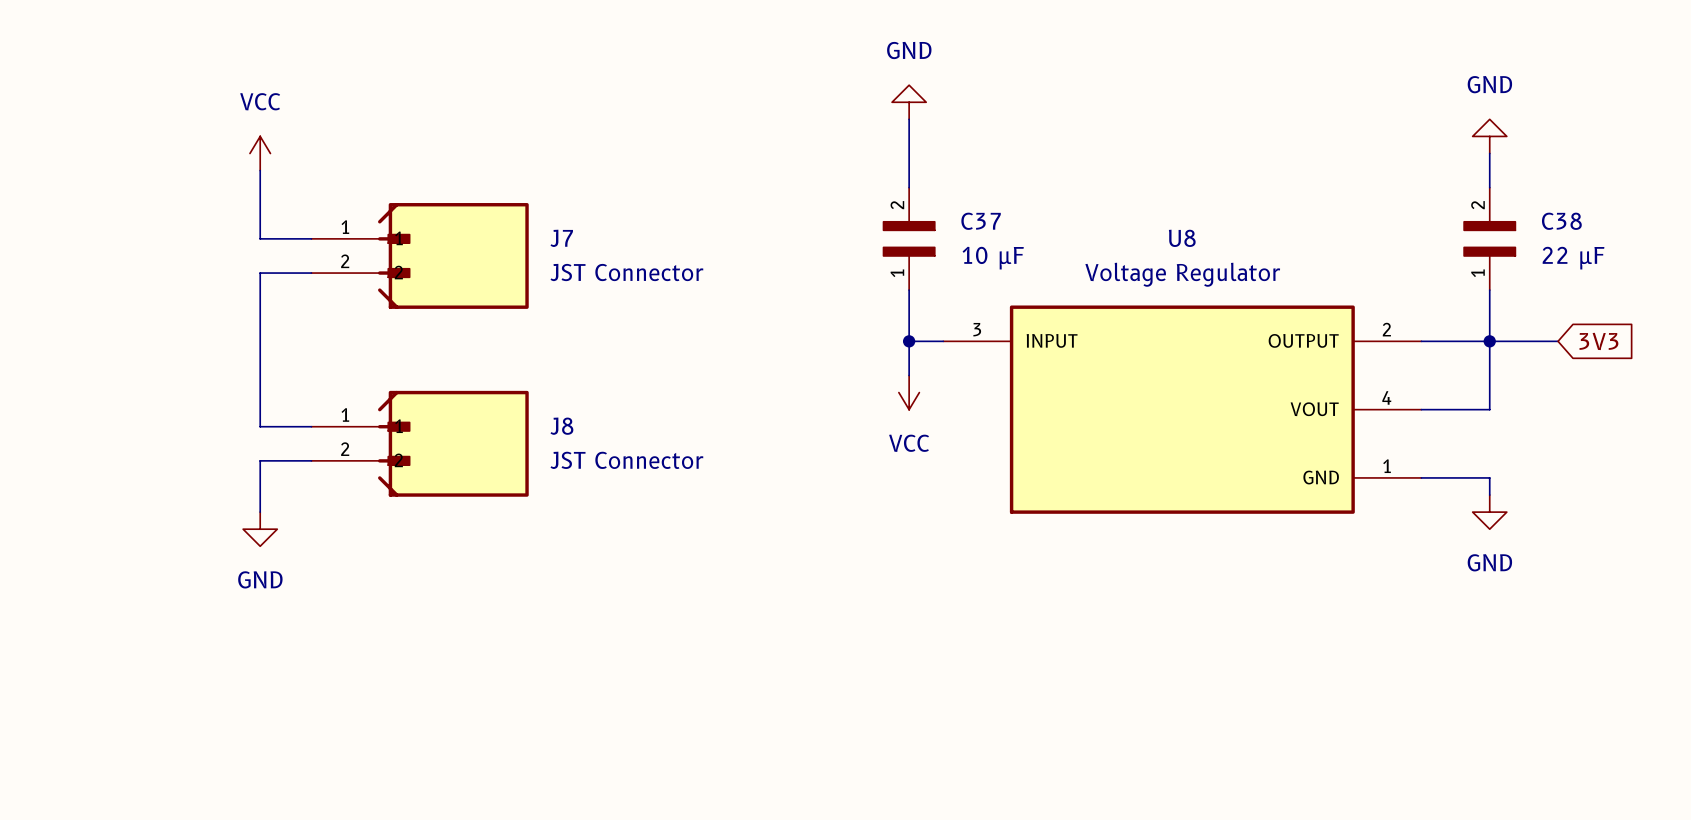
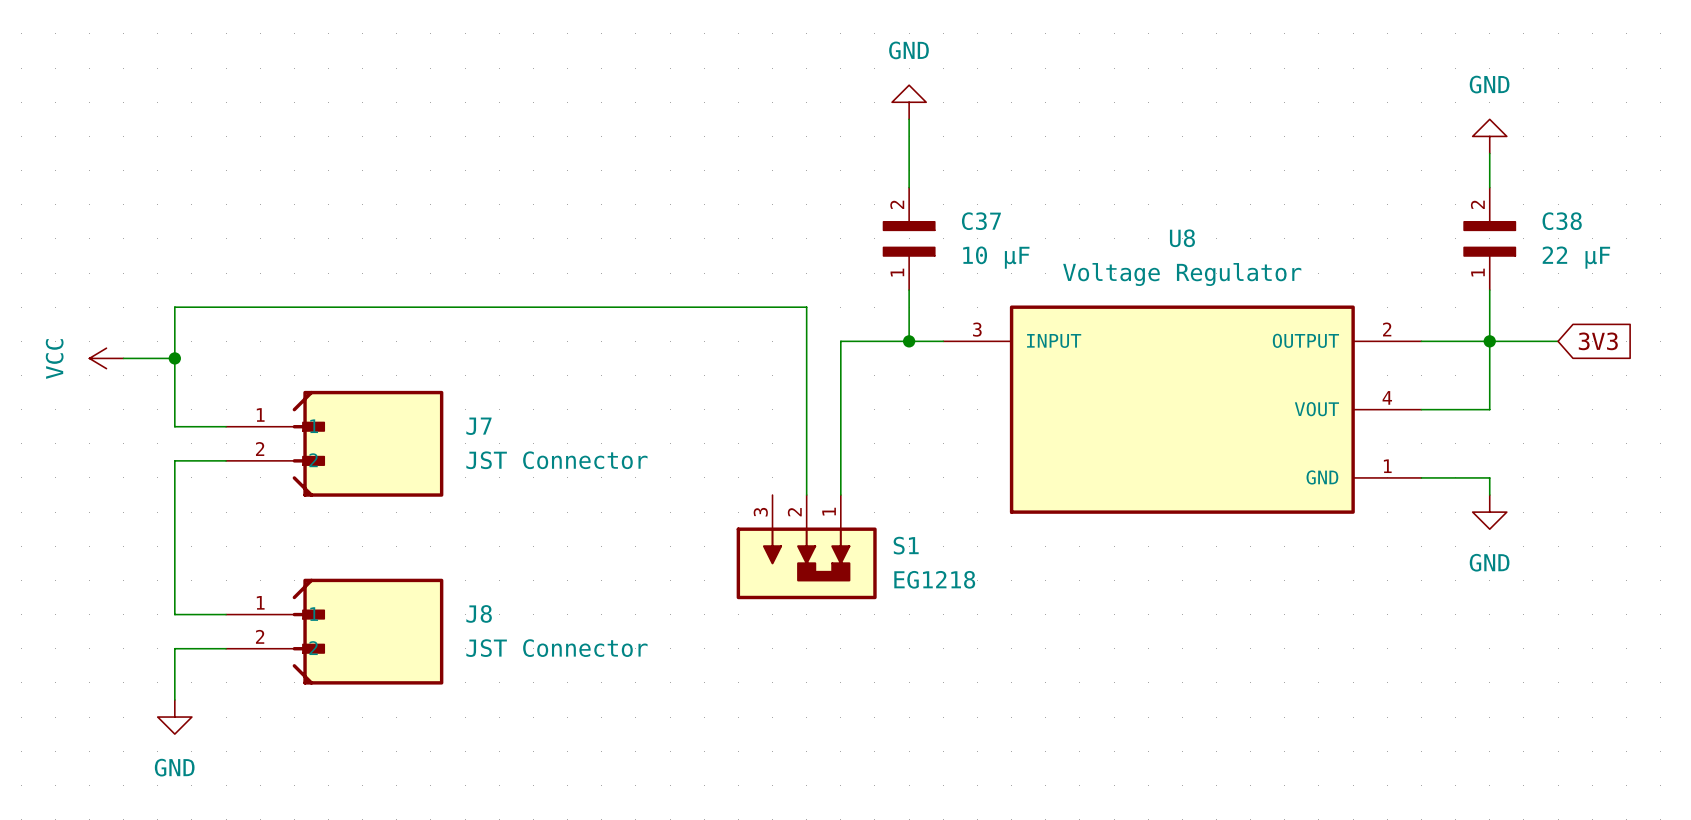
power symbol rotation: 0° (260, 153) -> 90° counterclockwise (106, 358)
power symbol position: VCC (260, 153) -> VCC (106, 358)
wire: (260, 170) (260, 238) (311, 238) -> none
J7 position: (420, 255) -> (334, 443)
wire: (311, 273) (260, 273) (260, 426) (311, 426) -> (226, 460) (174, 460) (174, 614) (226, 614)
wire: (909, 341) (909, 375) -> (909, 341) (840, 341) (840, 495)
wire: none -> (123, 358) (174, 358)
junction: none -> (174, 358)
power symbol: VCC (909, 392) -> none
wire: none -> (226, 426) (174, 426) (174, 307) (806, 307) (806, 495)
J8 position: (420, 443) -> (334, 631)
wire: (311, 460) (260, 460) (260, 512) -> (226, 648) (174, 648) (174, 699)
power symbol position: GND (260, 529) -> GND (174, 717)
S1: none -> EG1218 (806, 547)

